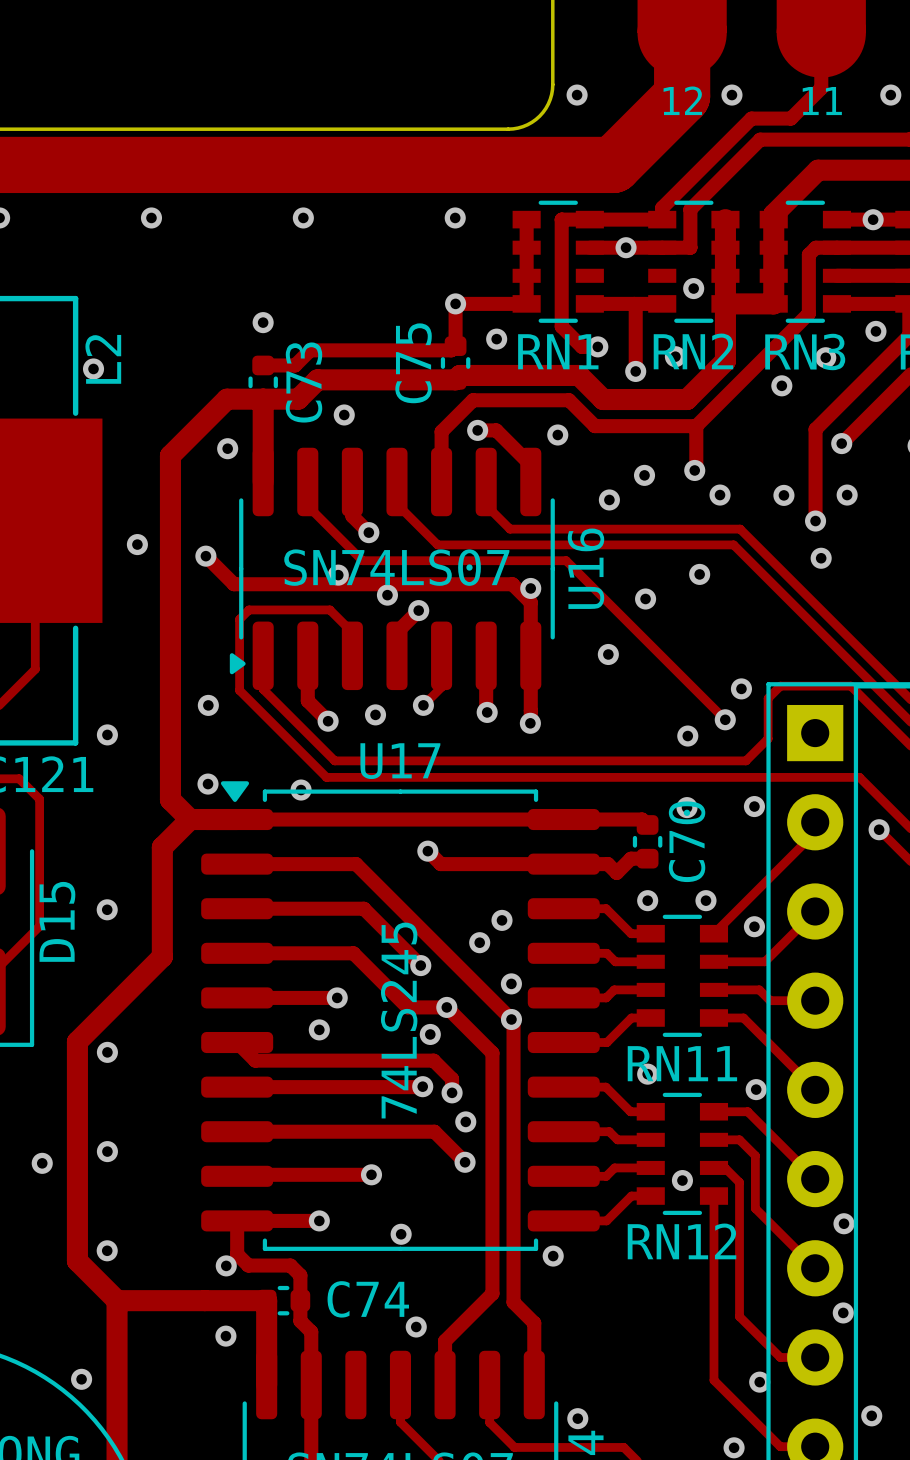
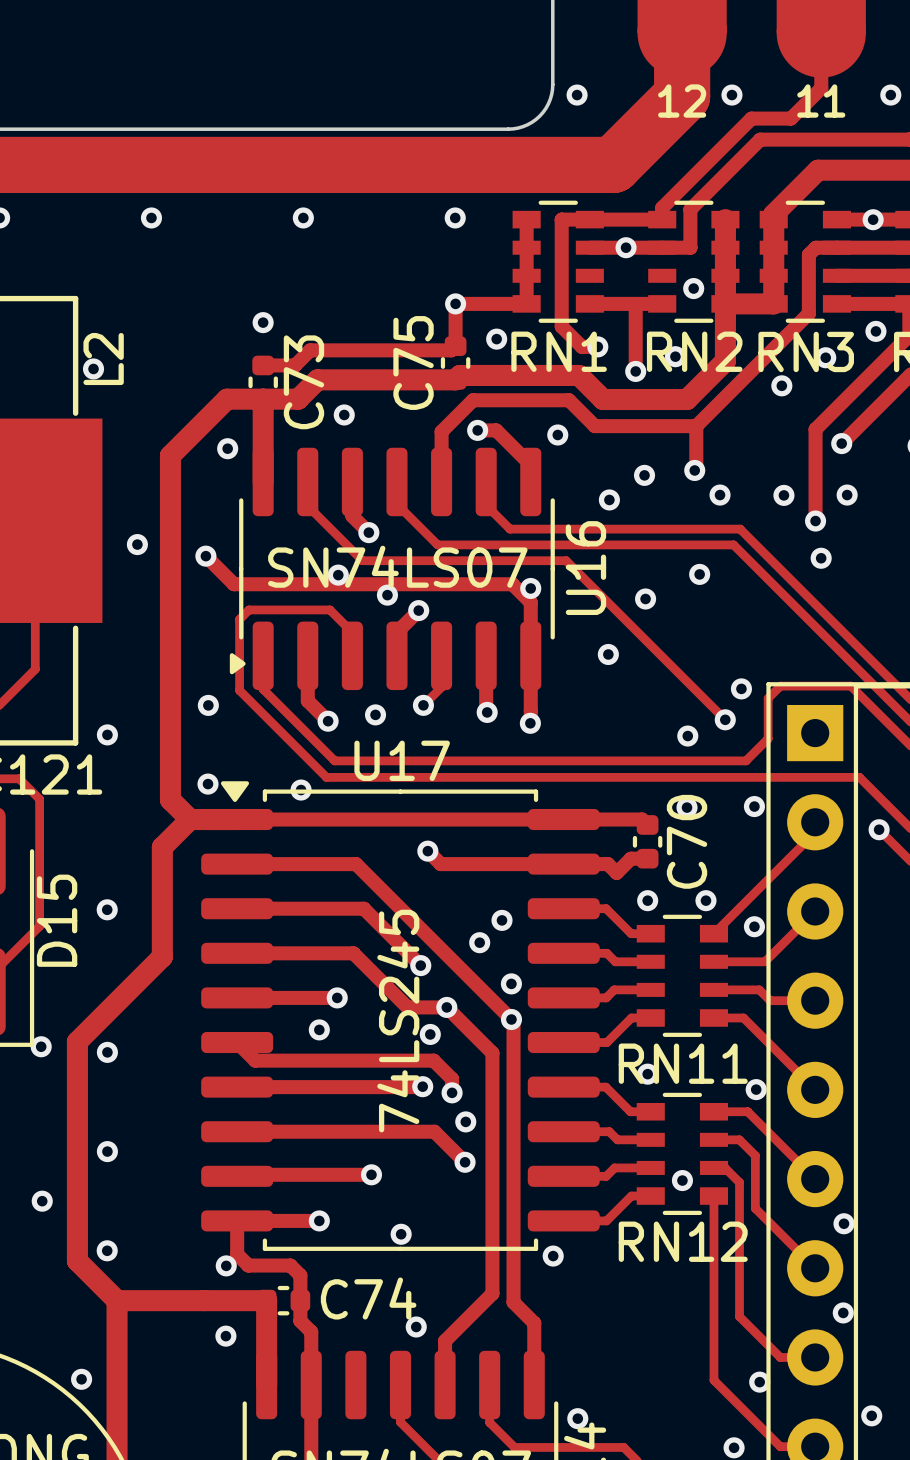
via: none -> (41, 1046)
via position: (42, 1163) -> (42, 1201)

